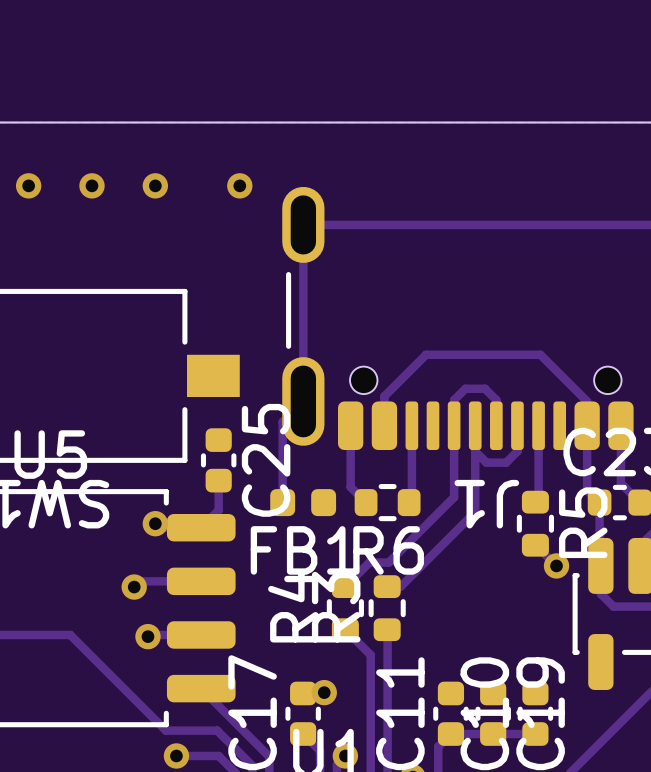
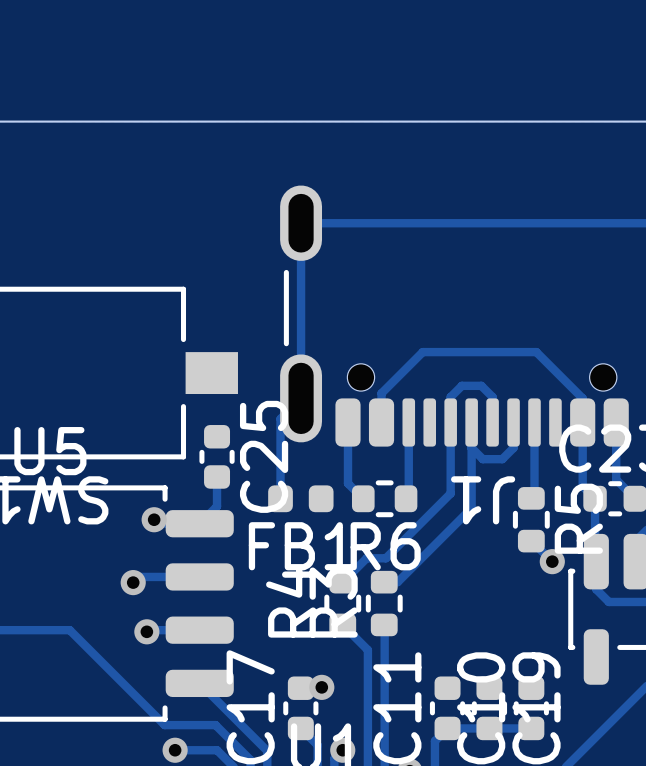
via: (28, 185) -> none
via: (91, 185) -> none
via: (155, 185) -> none
via: (239, 185) -> none

